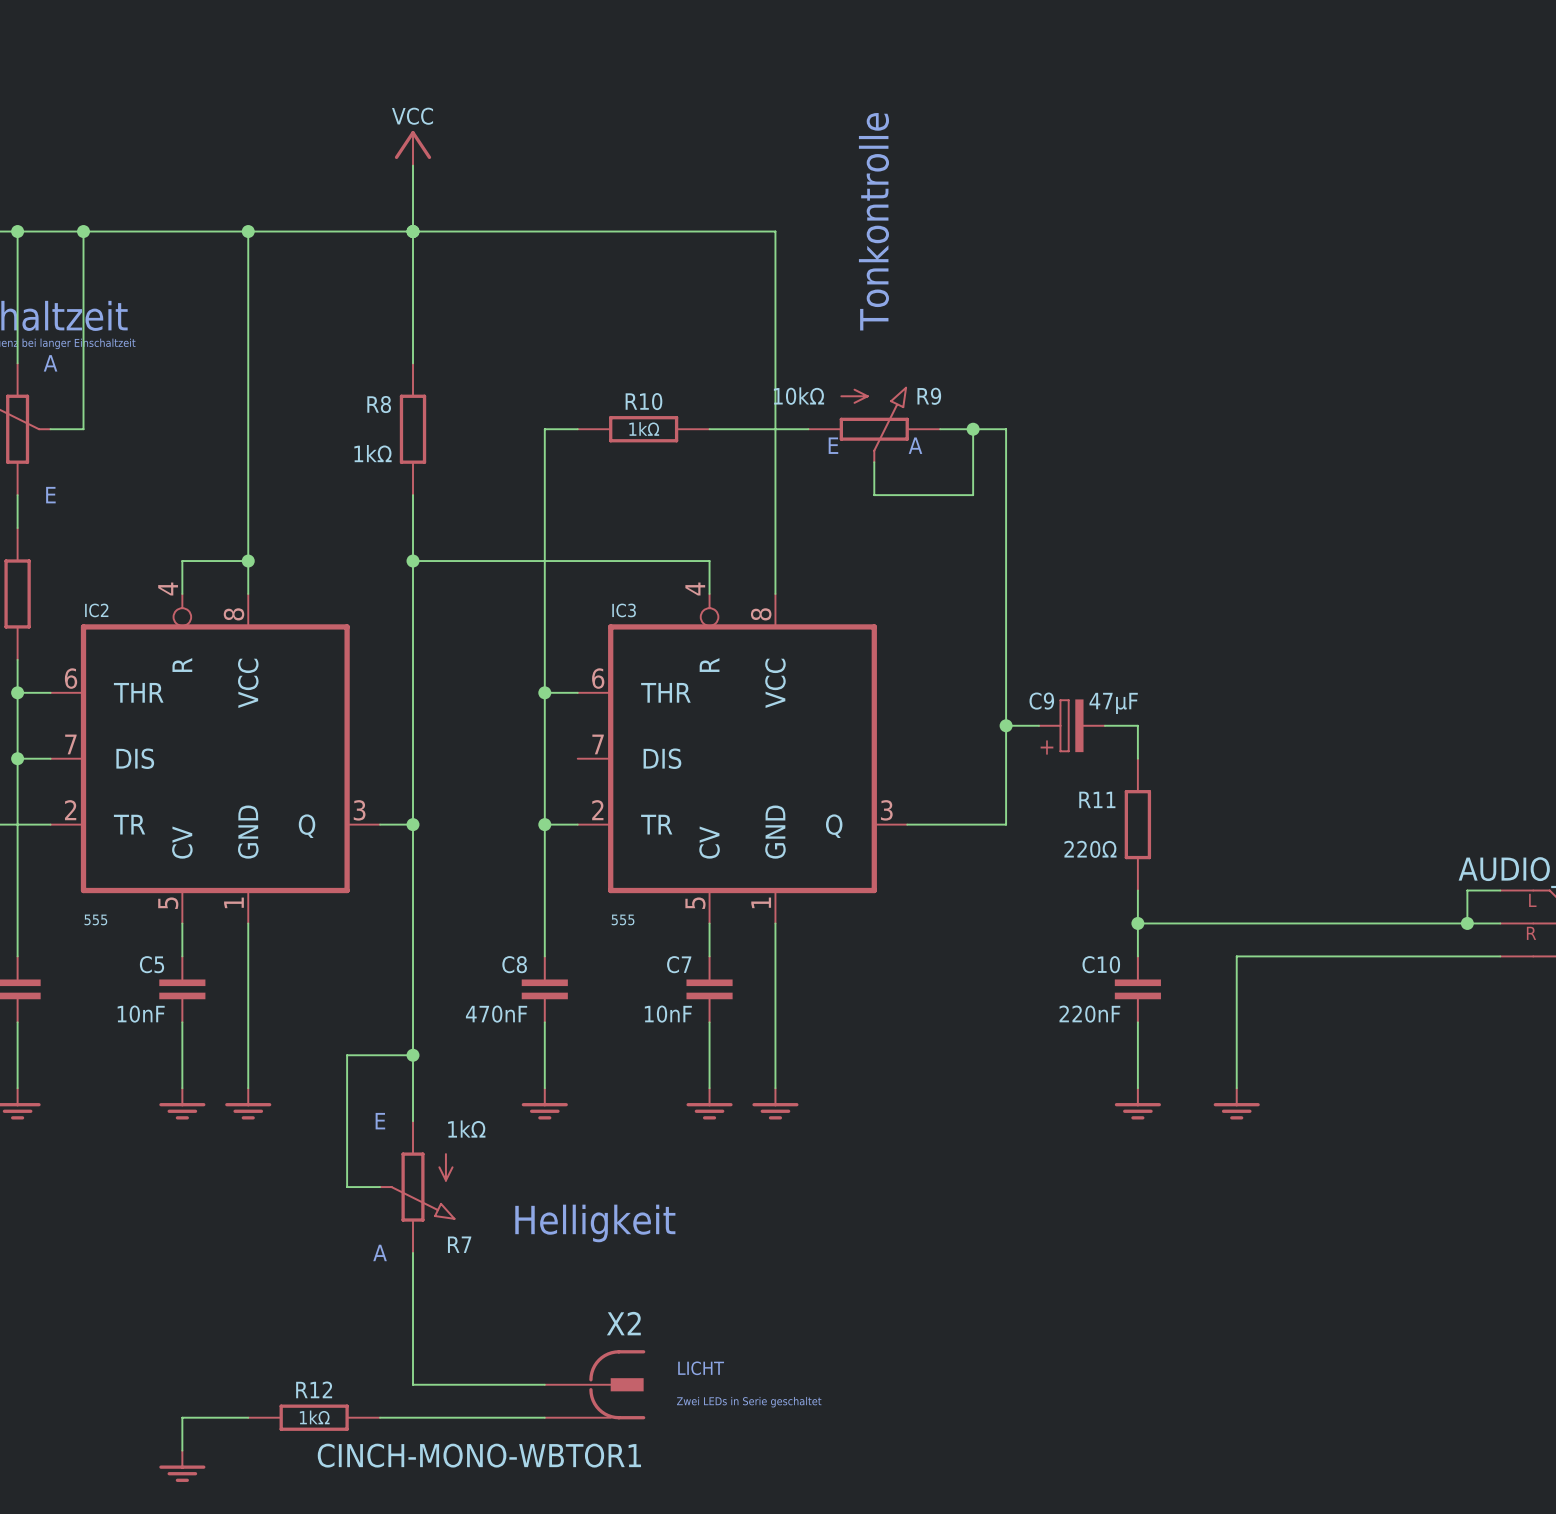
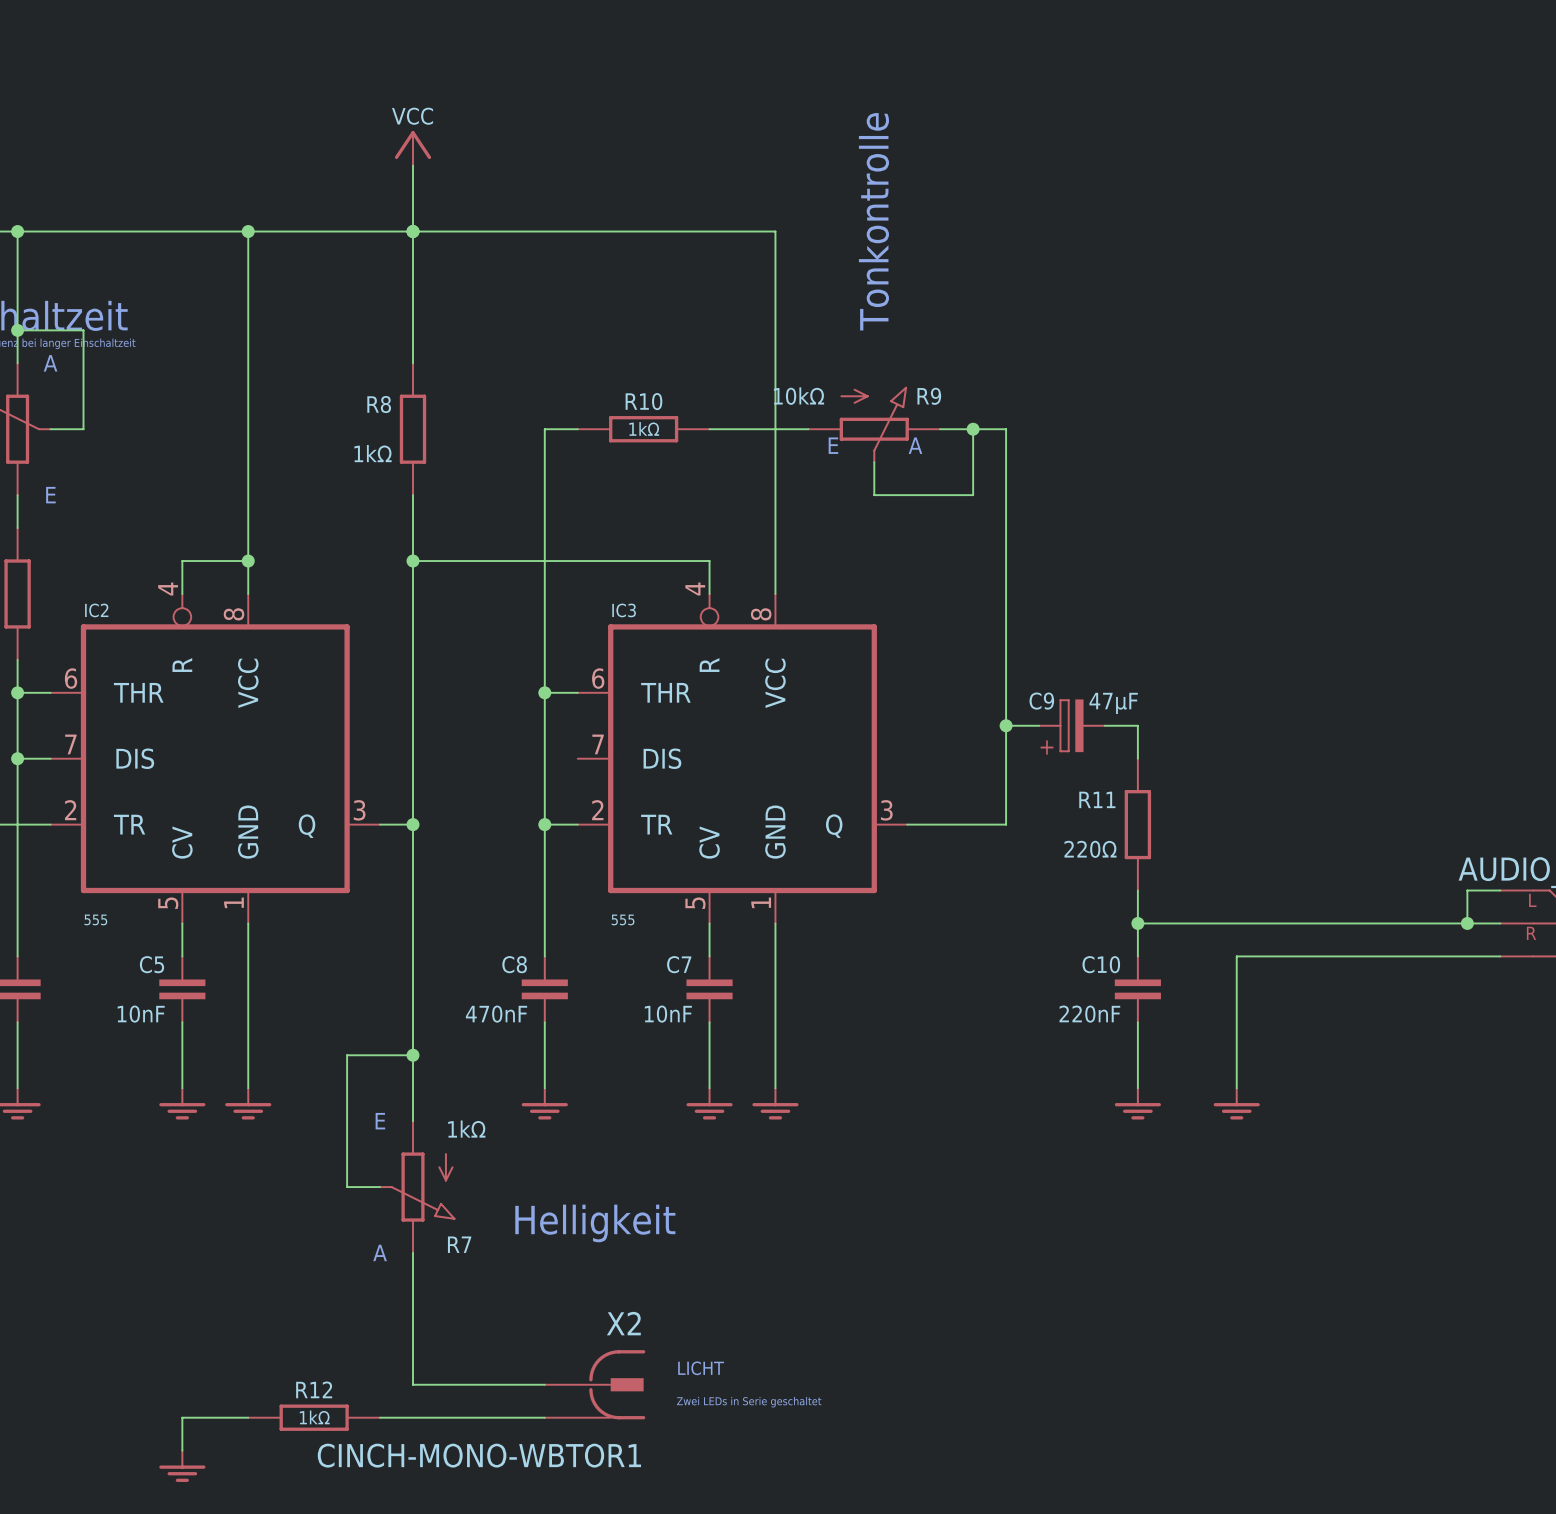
wire: (83, 231) (83, 330) -> (17, 330) (83, 330)
junction: (83, 231) -> none
junction: none -> (17, 330)

